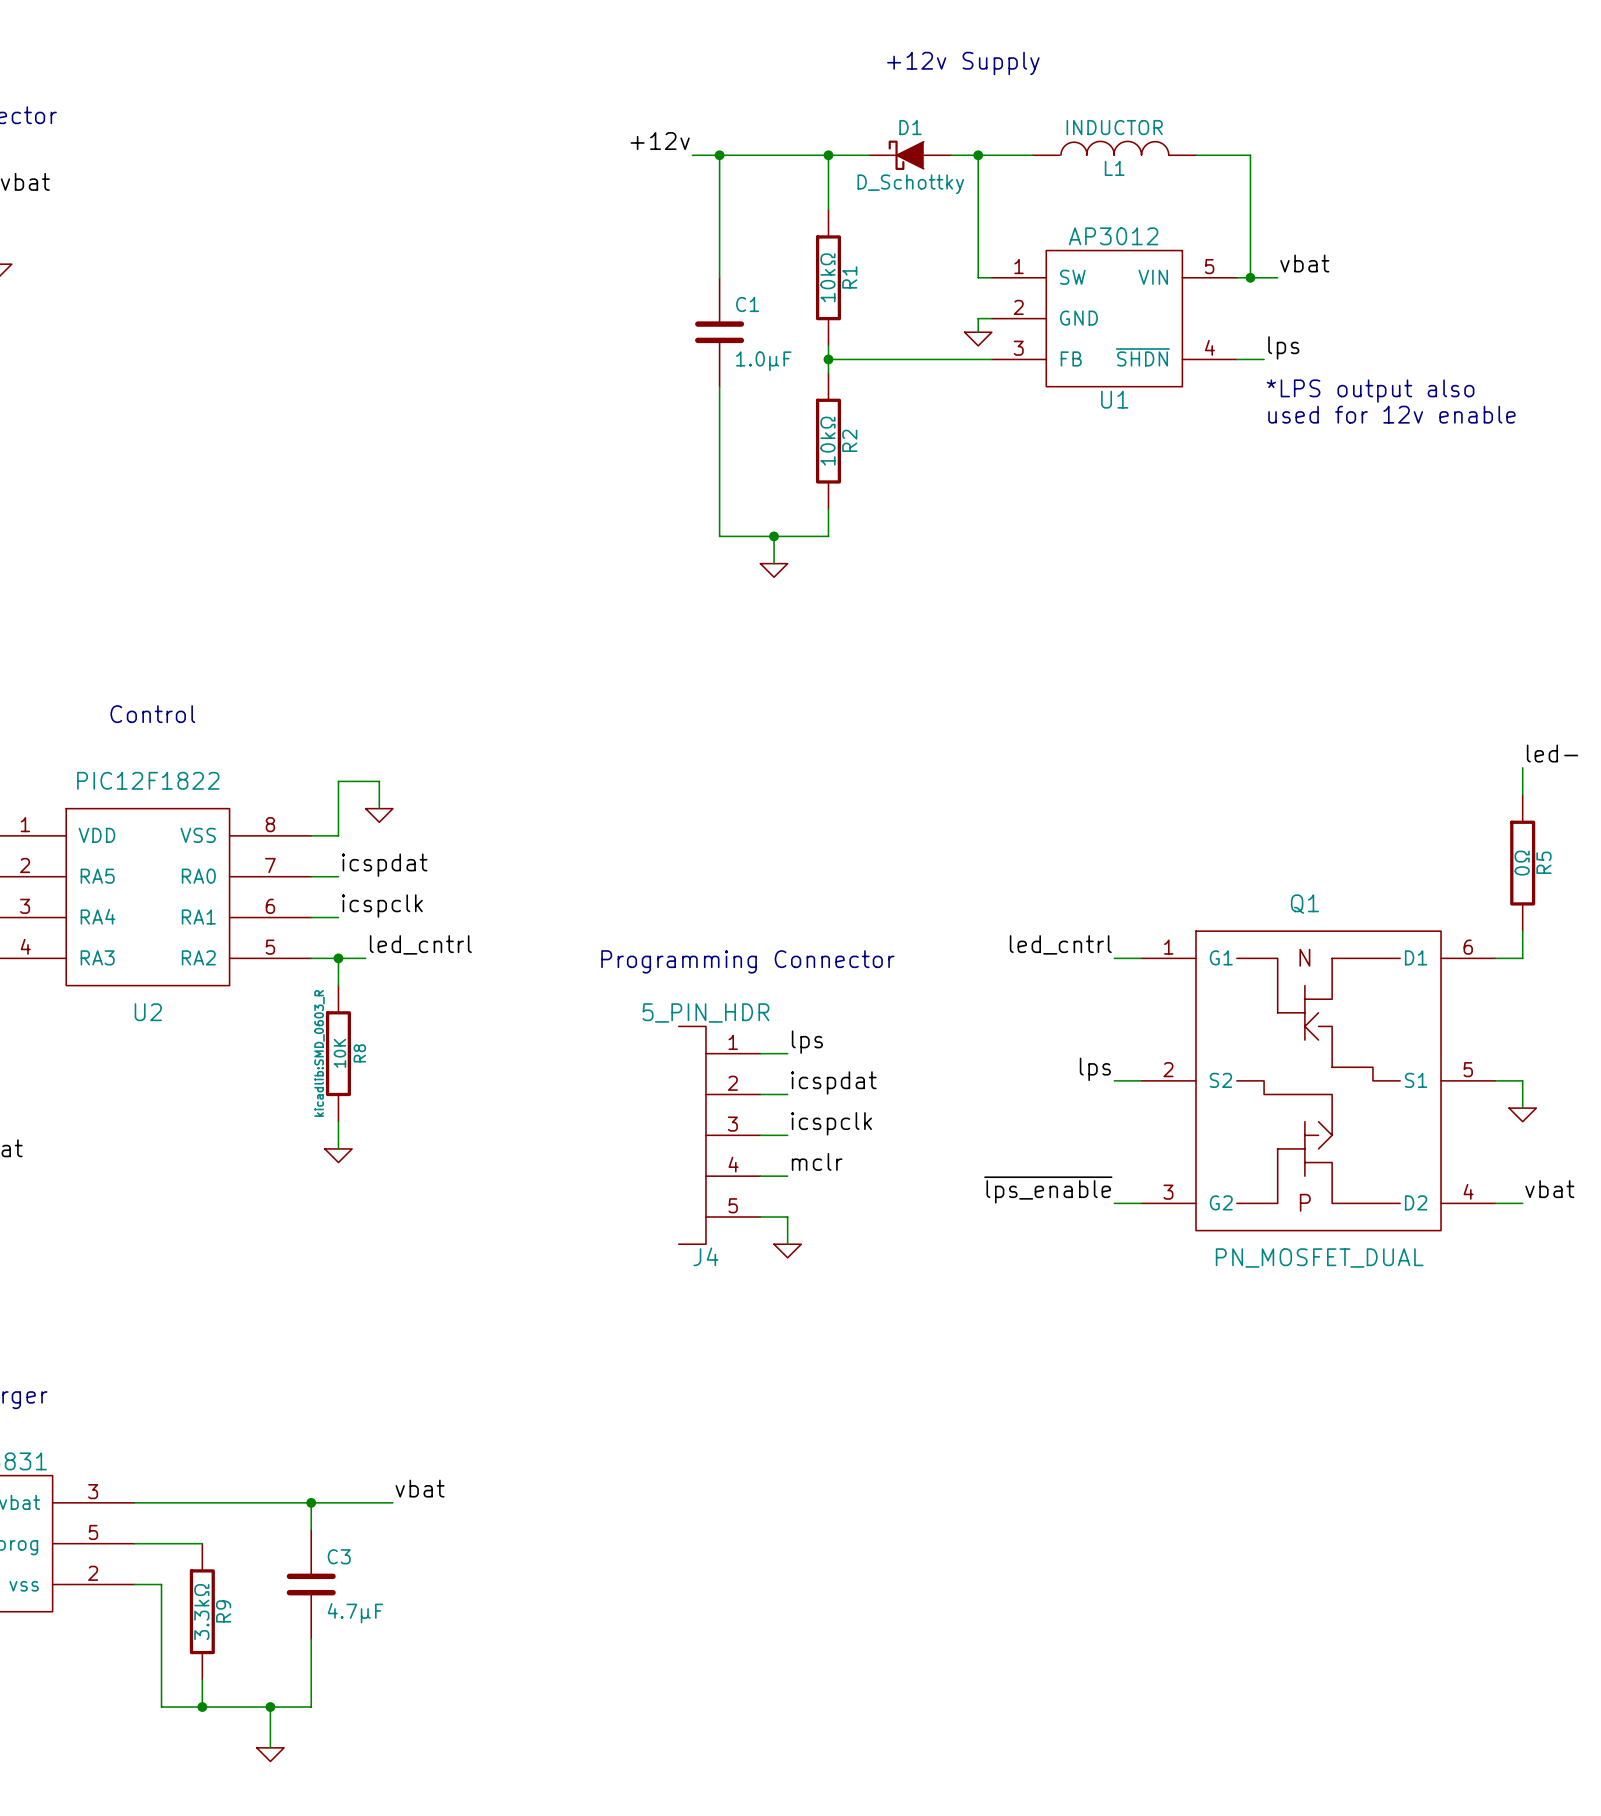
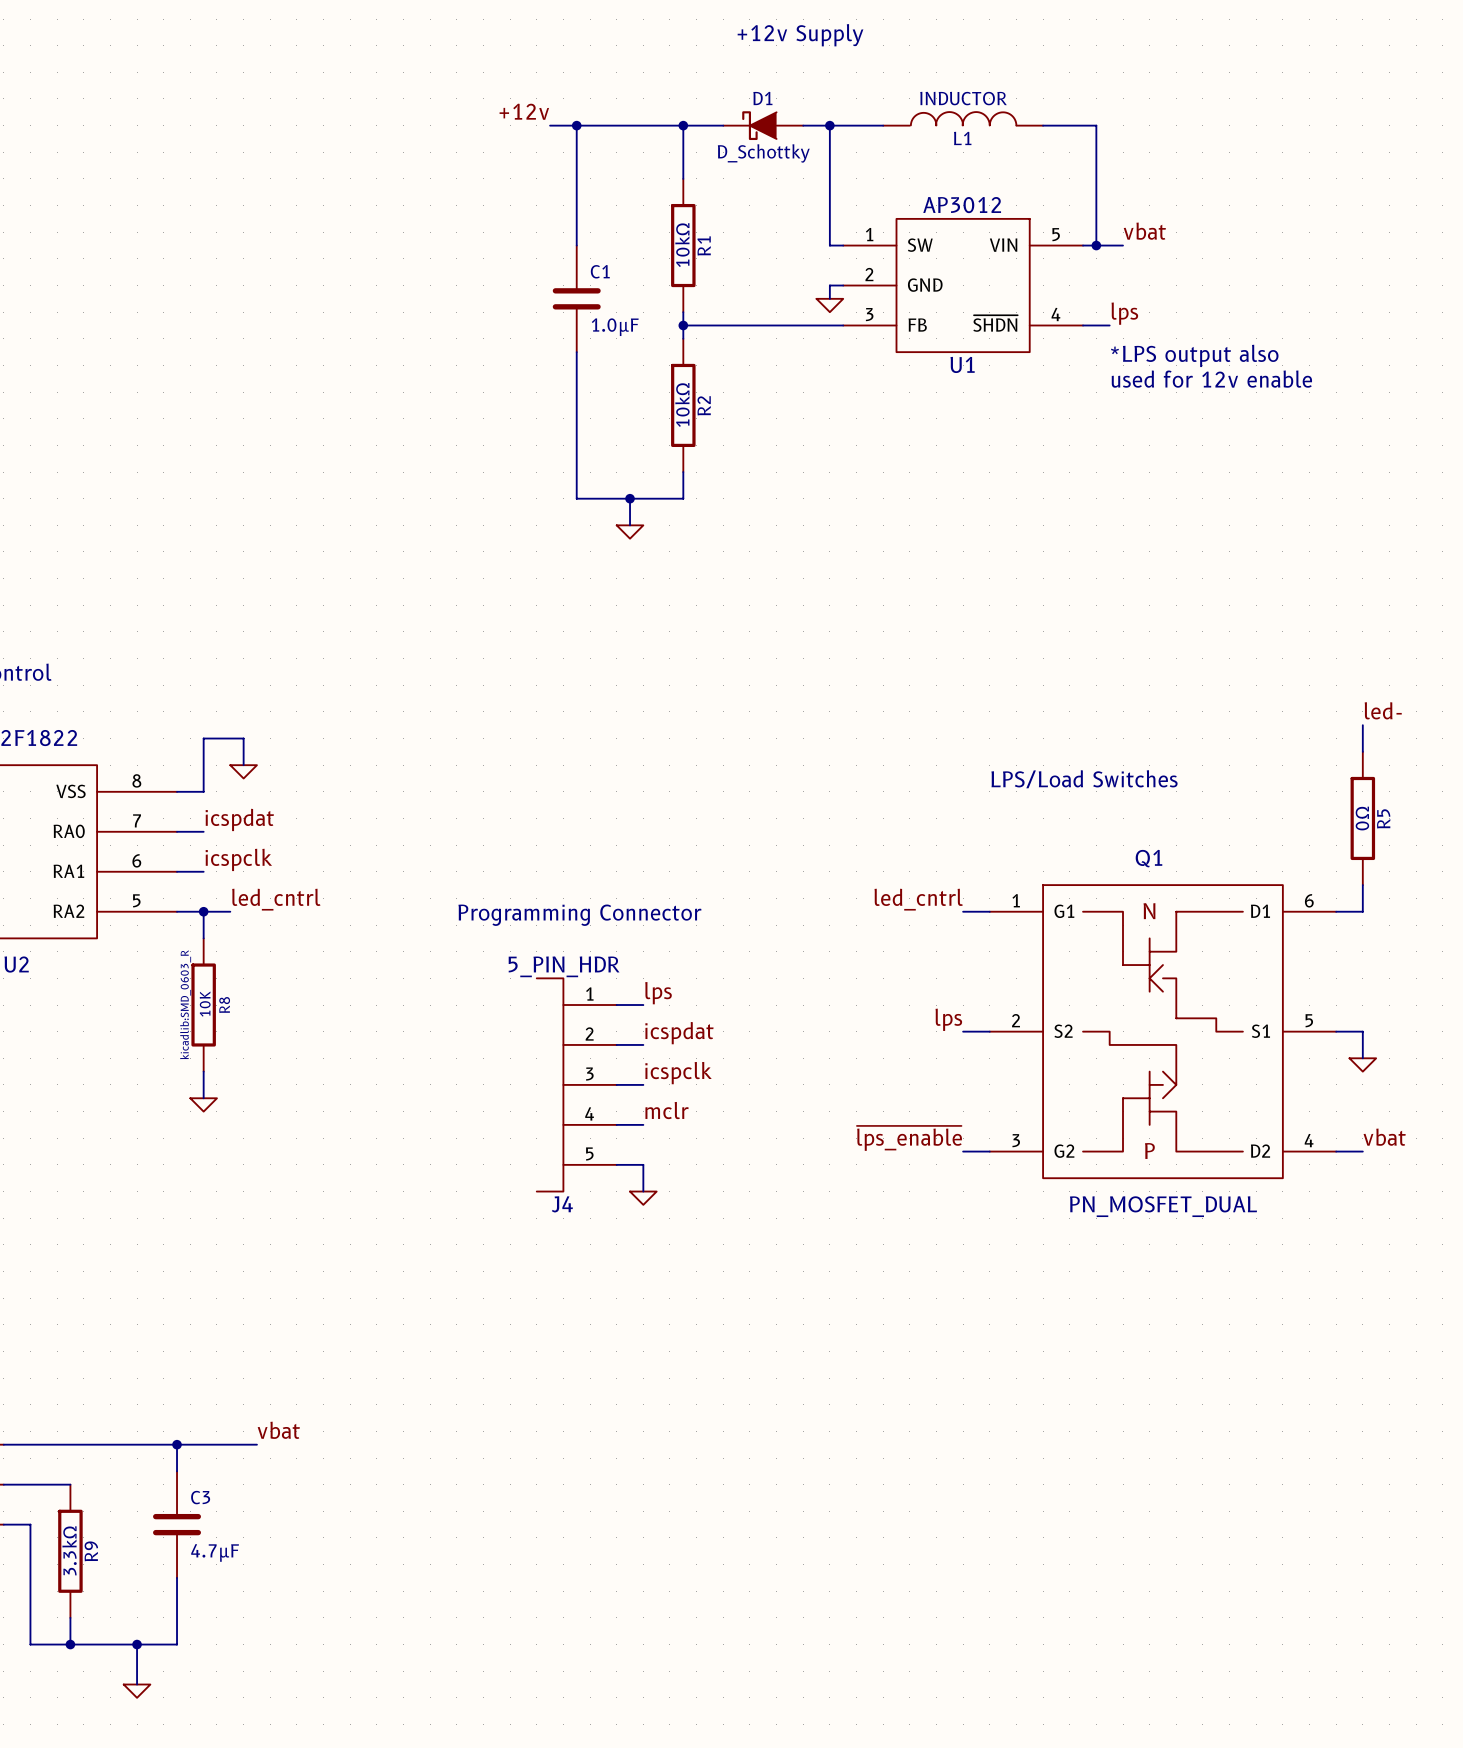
text: none -> LPS/Load Switches (1084, 779)

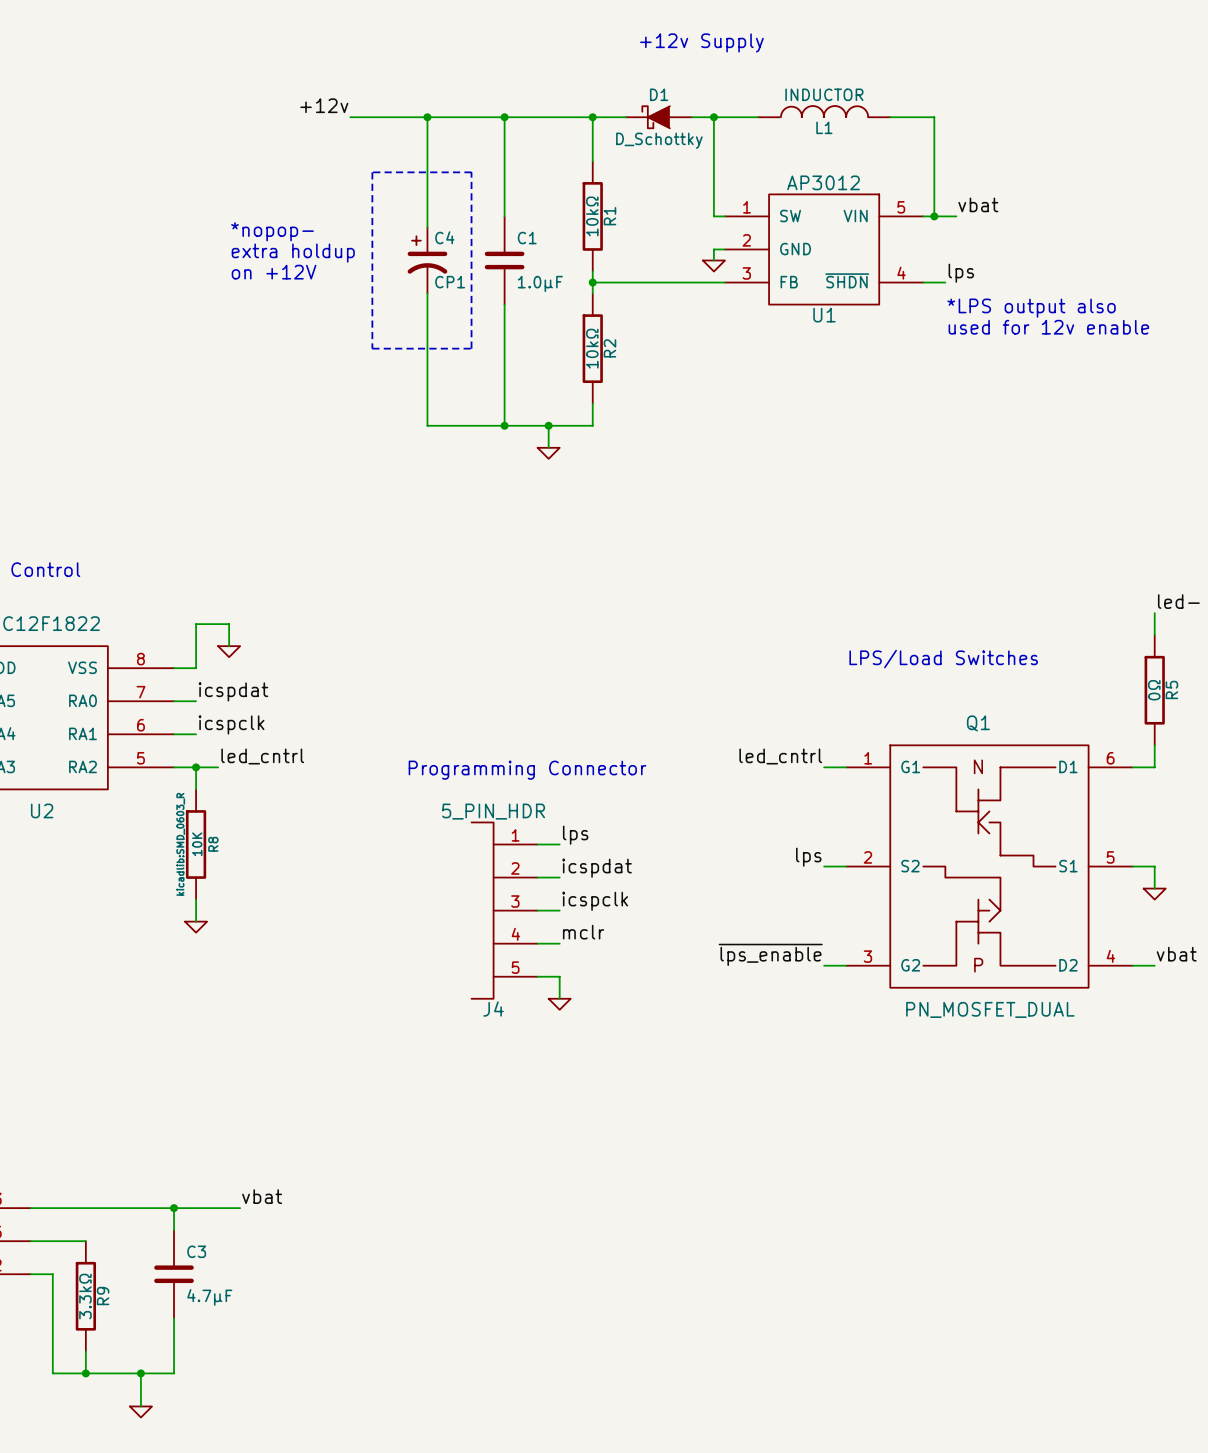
label position: +12v (524, 111) -> +12v (324, 105)
wire: none -> (350, 117) (482, 117)
wire: none -> (427, 117) (427, 227)
junction: none -> (427, 117)
line: none -> (372, 172) (372, 348) (471, 348) (471, 172) (372, 172)
text: none -> *nopop- (272, 231)
text: none -> extra holdup (293, 253)
C4: none -> CP1 (427, 260)
text: none -> on +12V (274, 272)
wire: none -> (427, 293) (427, 425) (504, 425)
junction: none -> (504, 425)

